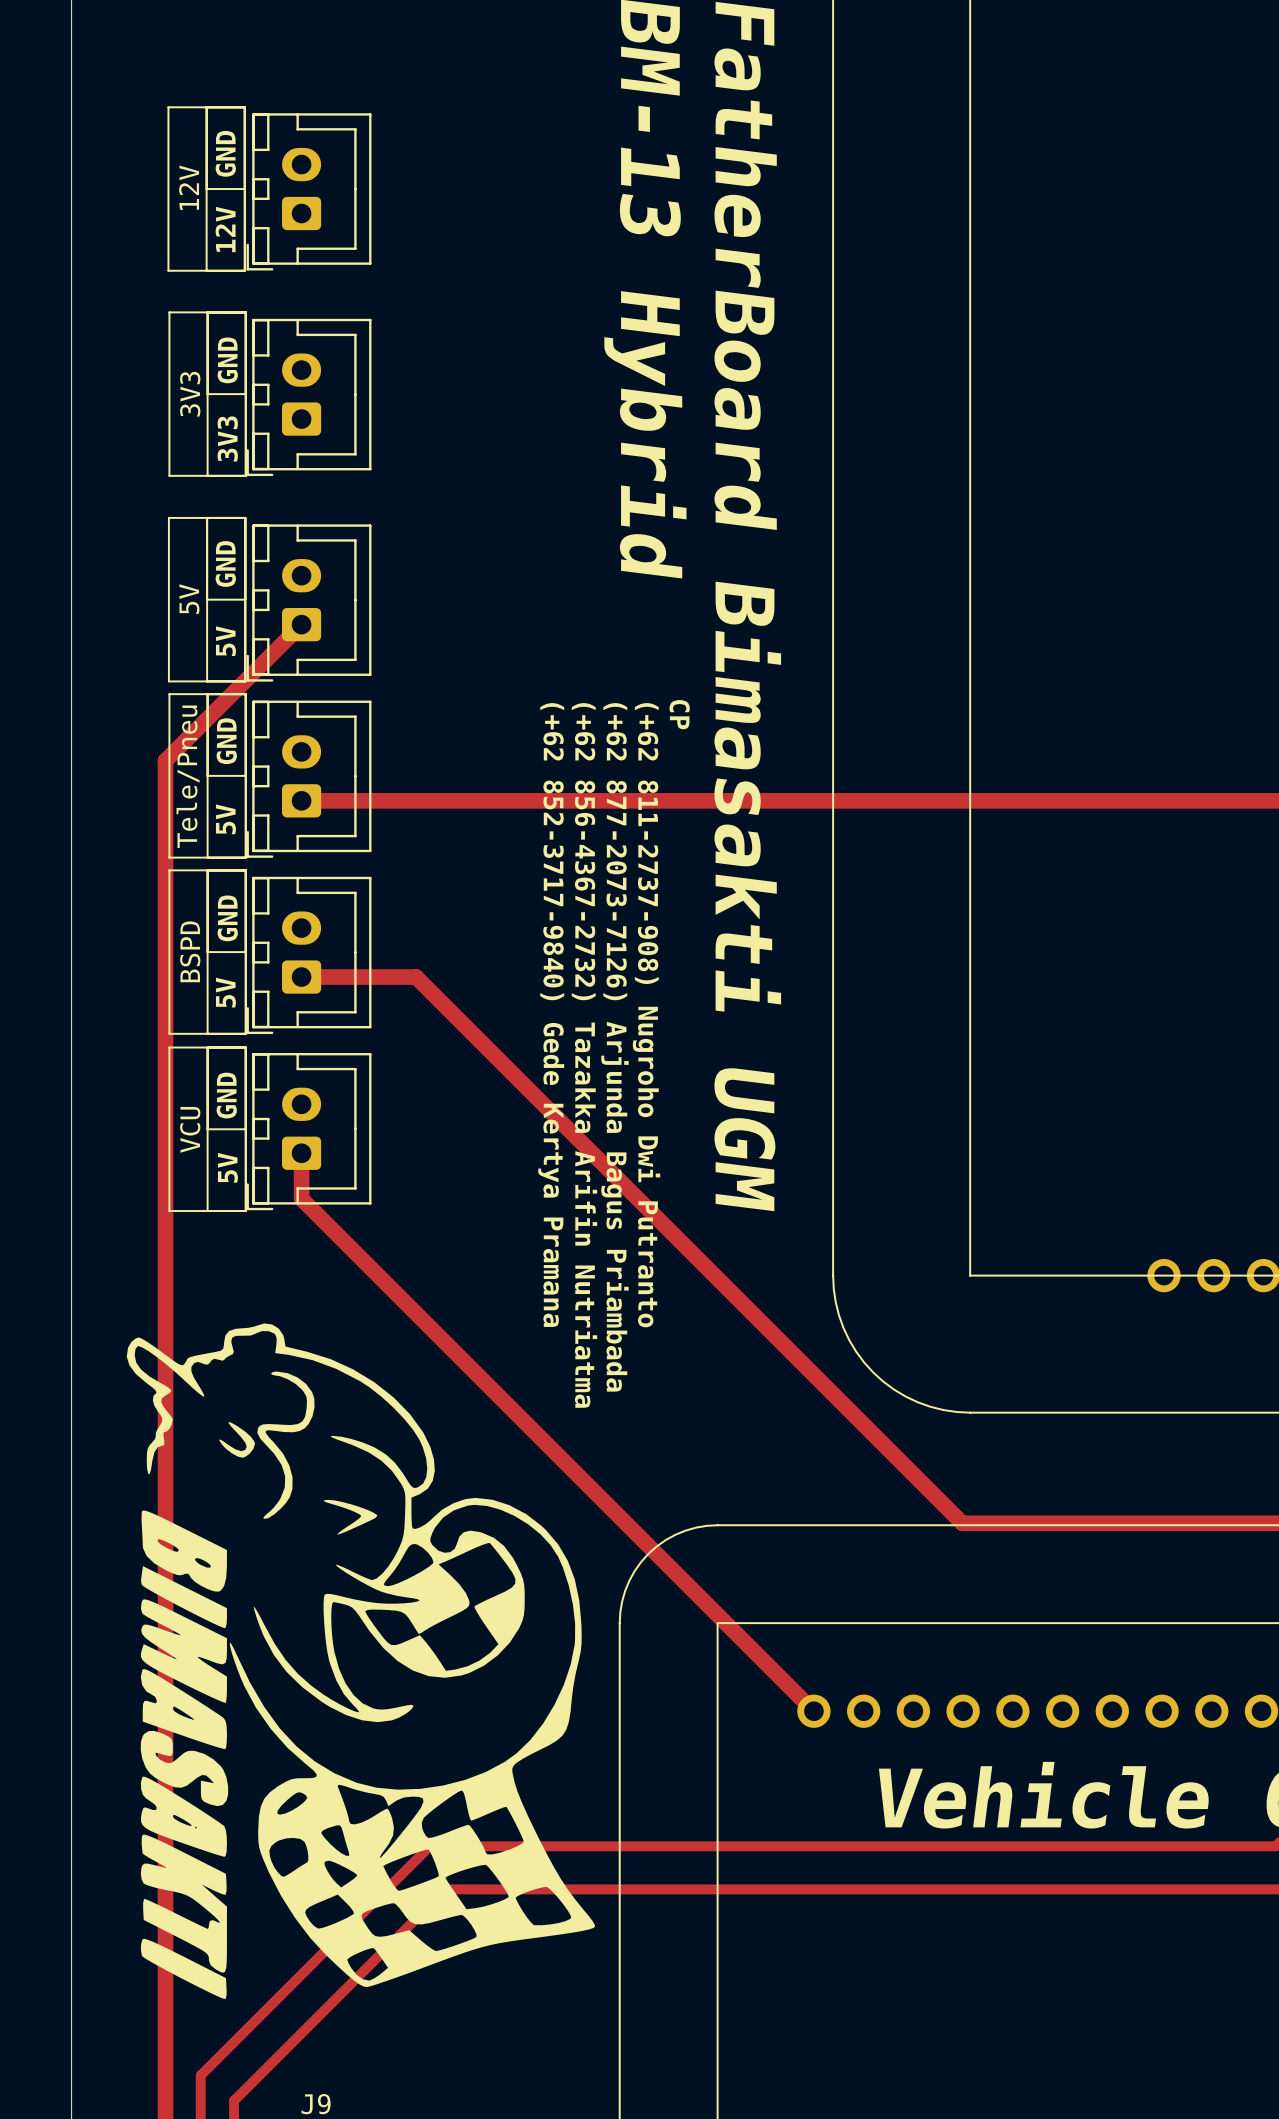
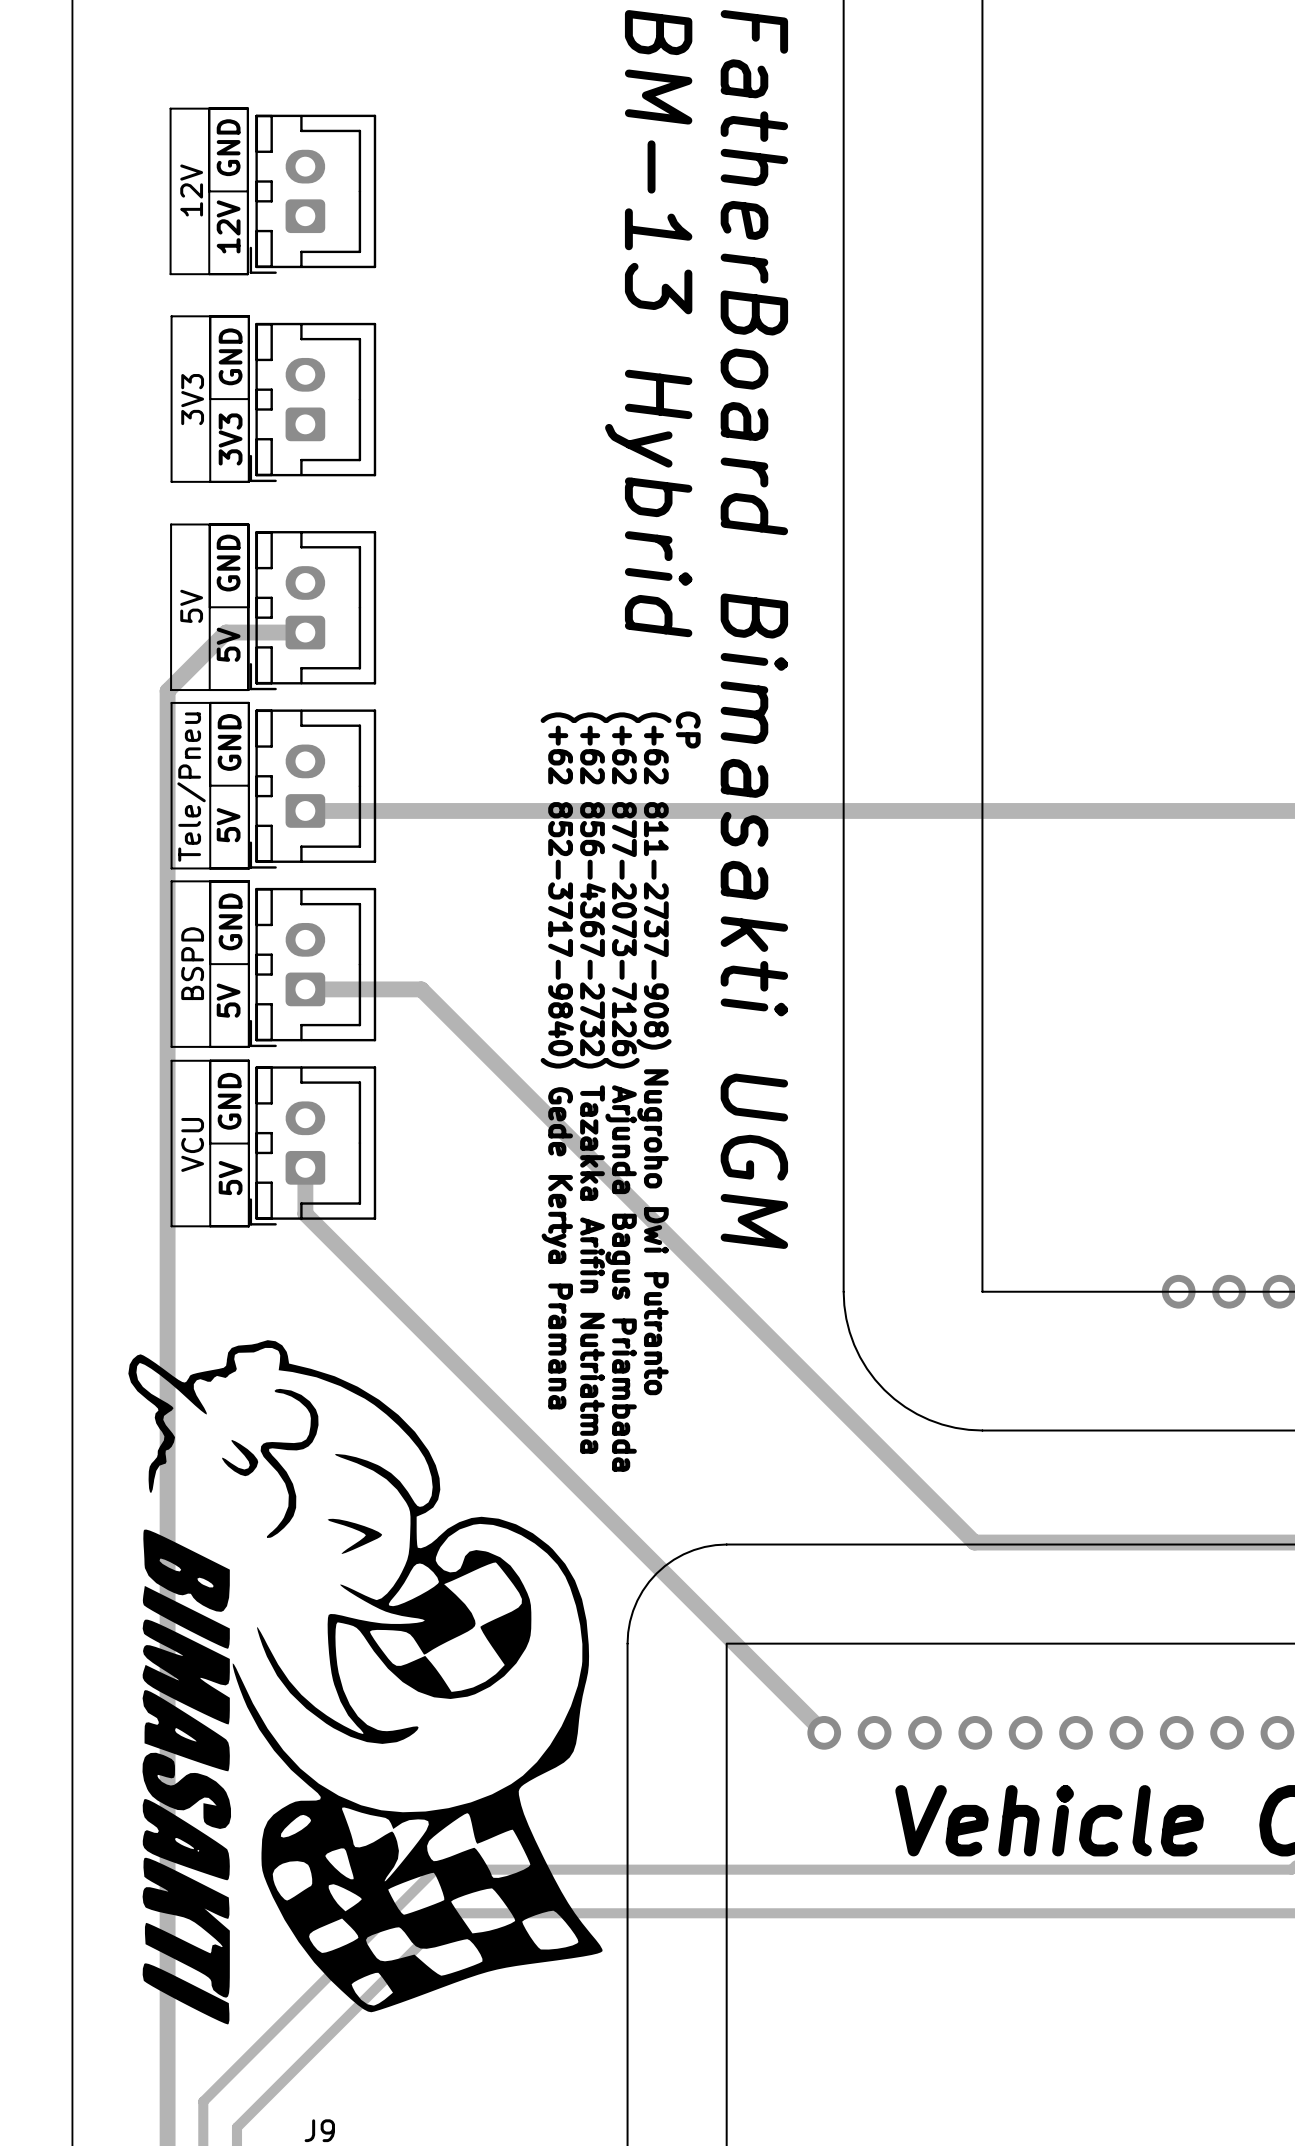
track: (301, 624) (165, 760) -> (305, 632) (226, 632) (167, 691) (167, 770)

